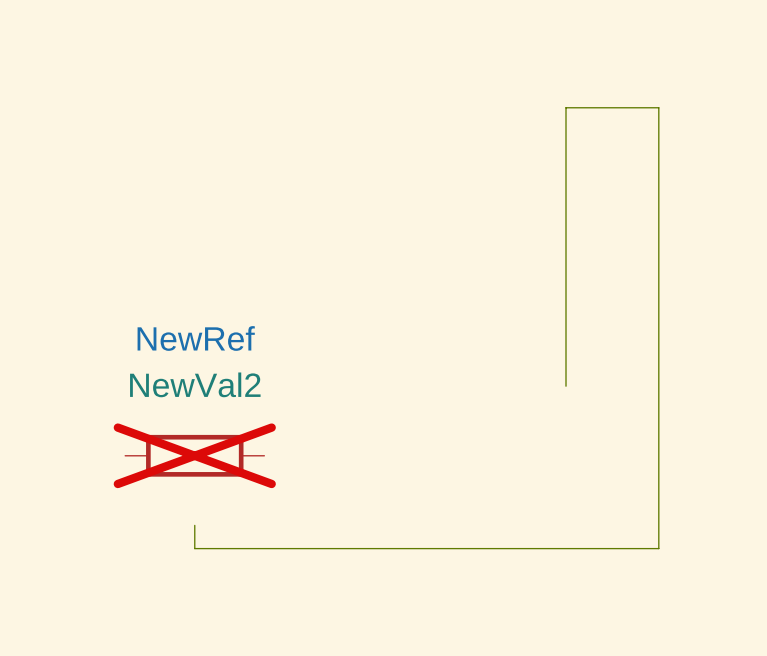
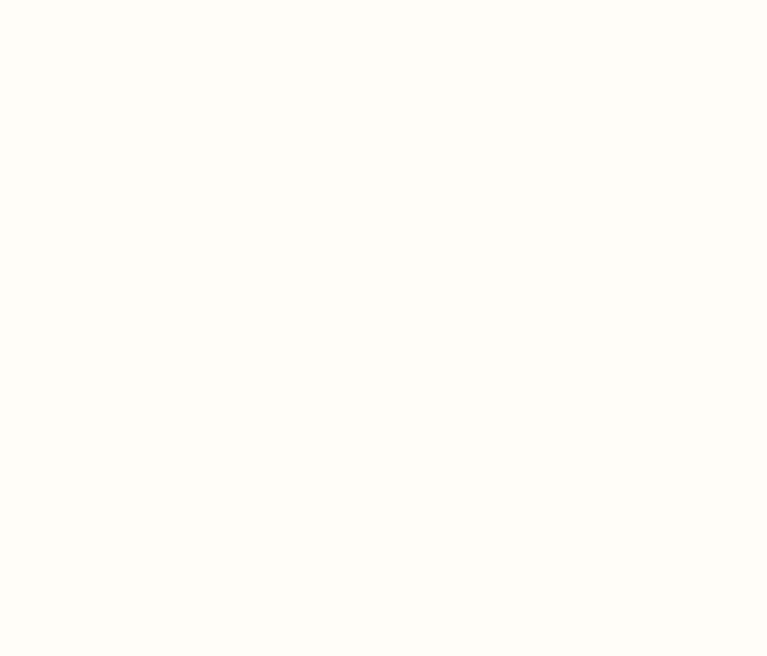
wire: (566, 386) (566, 107) (658, 107) (658, 548) (194, 548) (194, 525) -> none
NewRef: NewVal2 (194, 455) -> none

